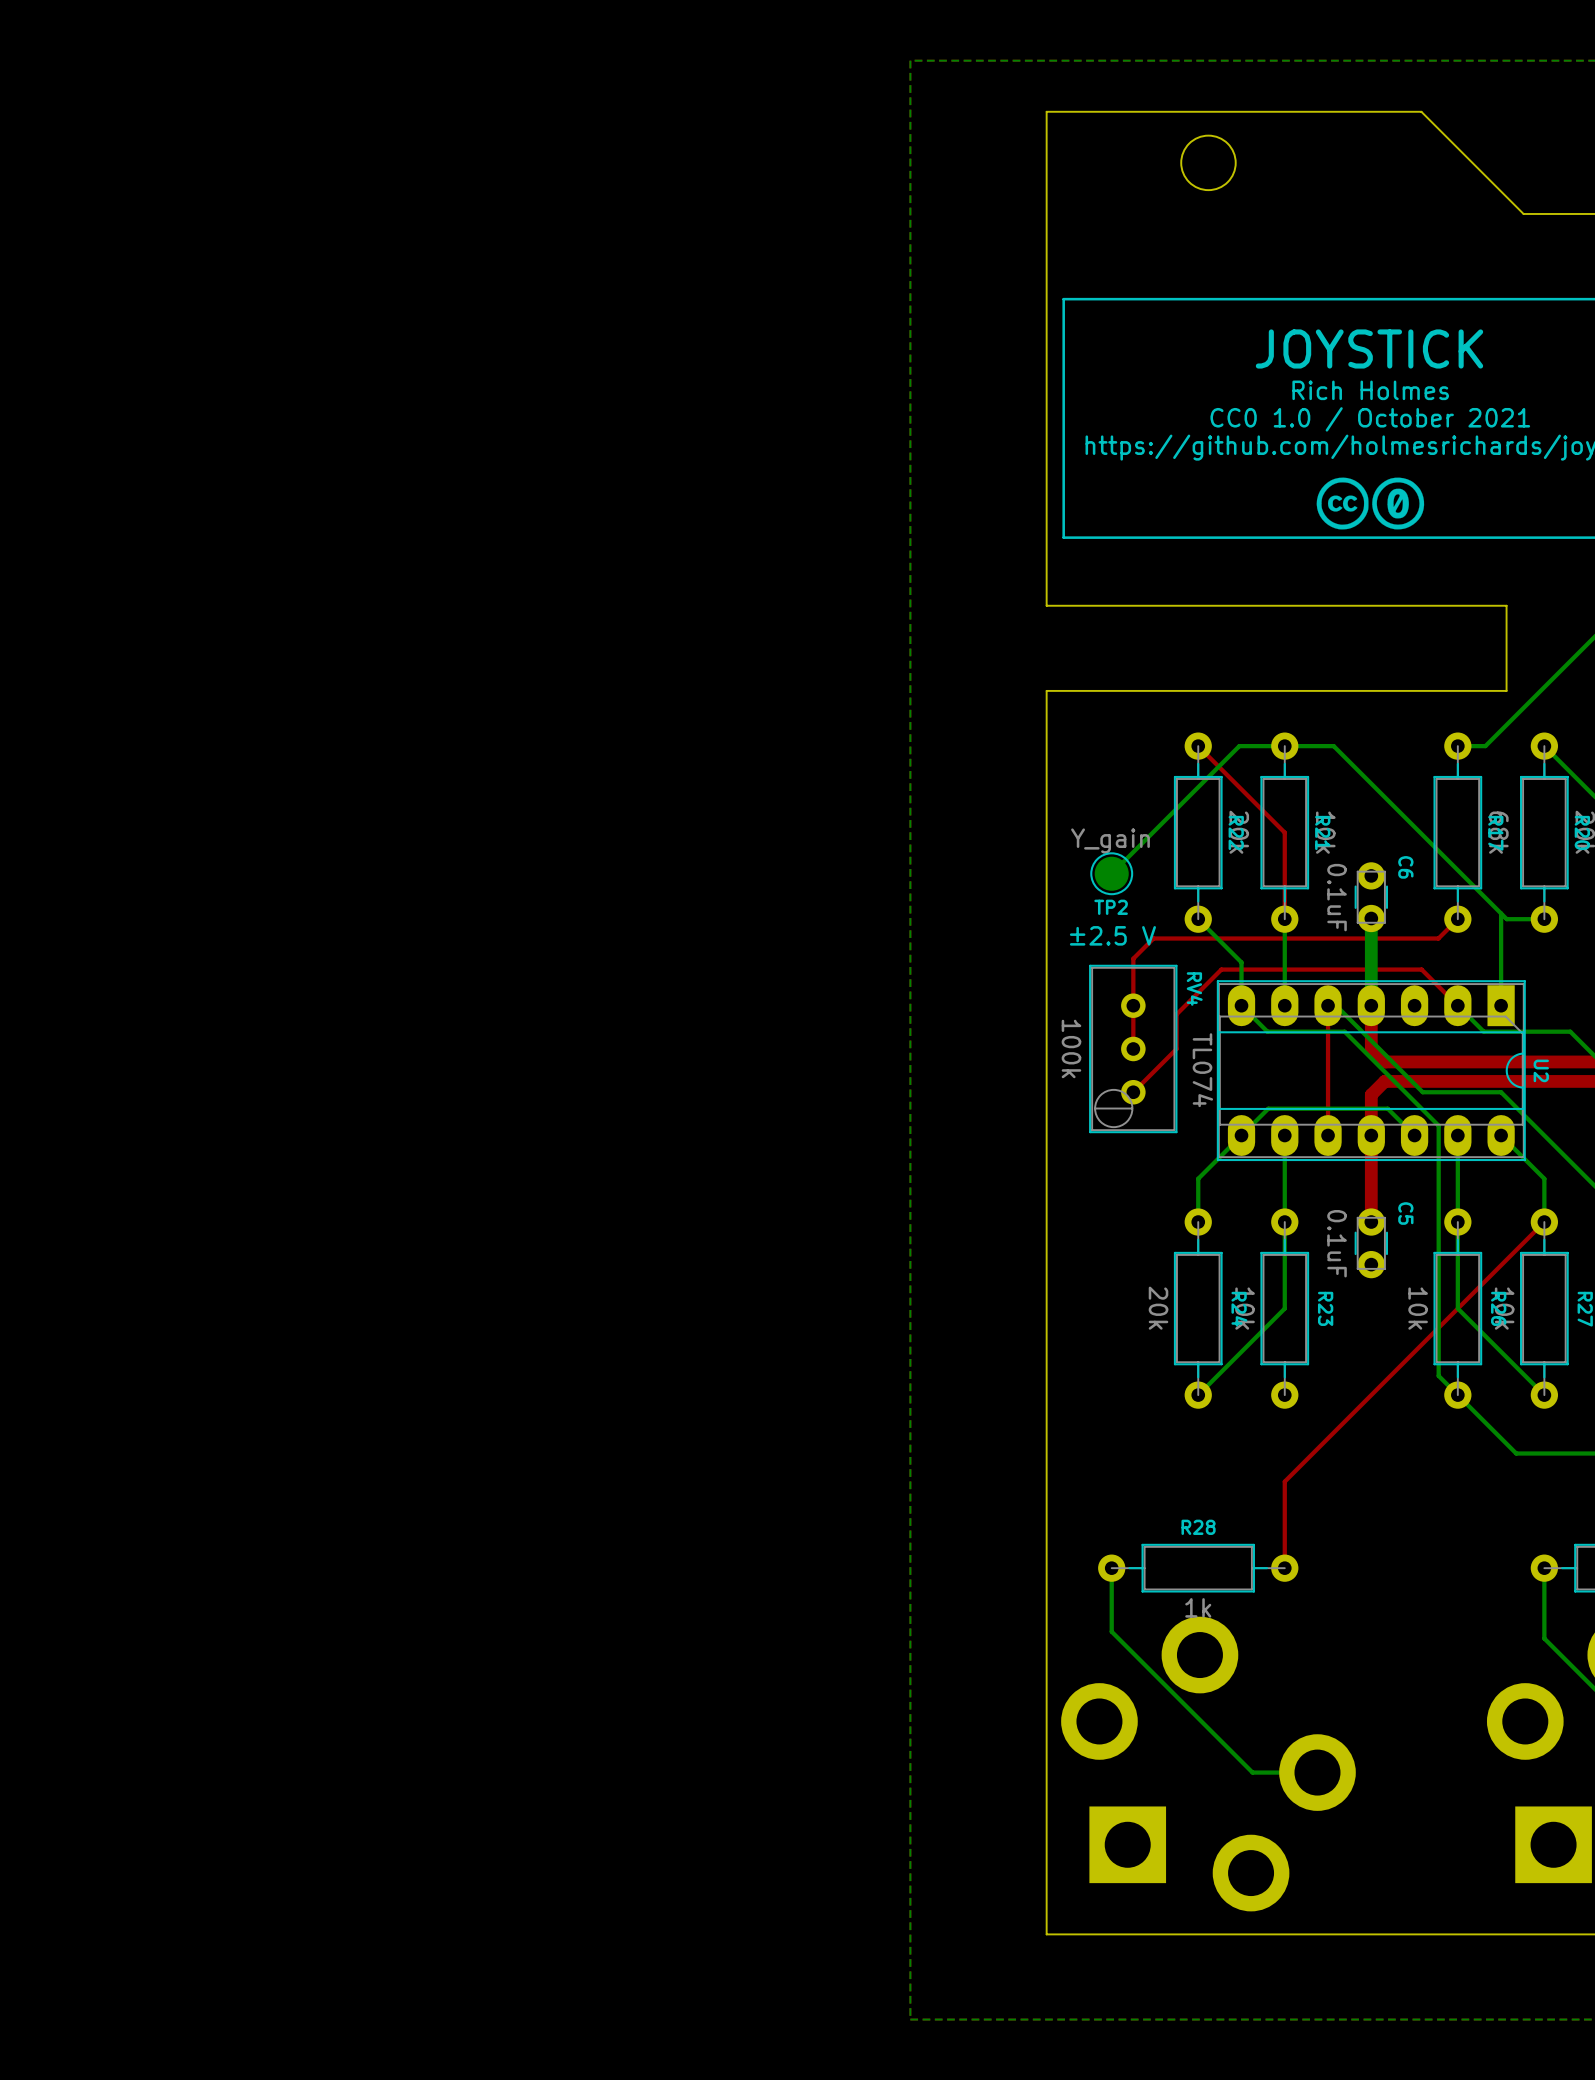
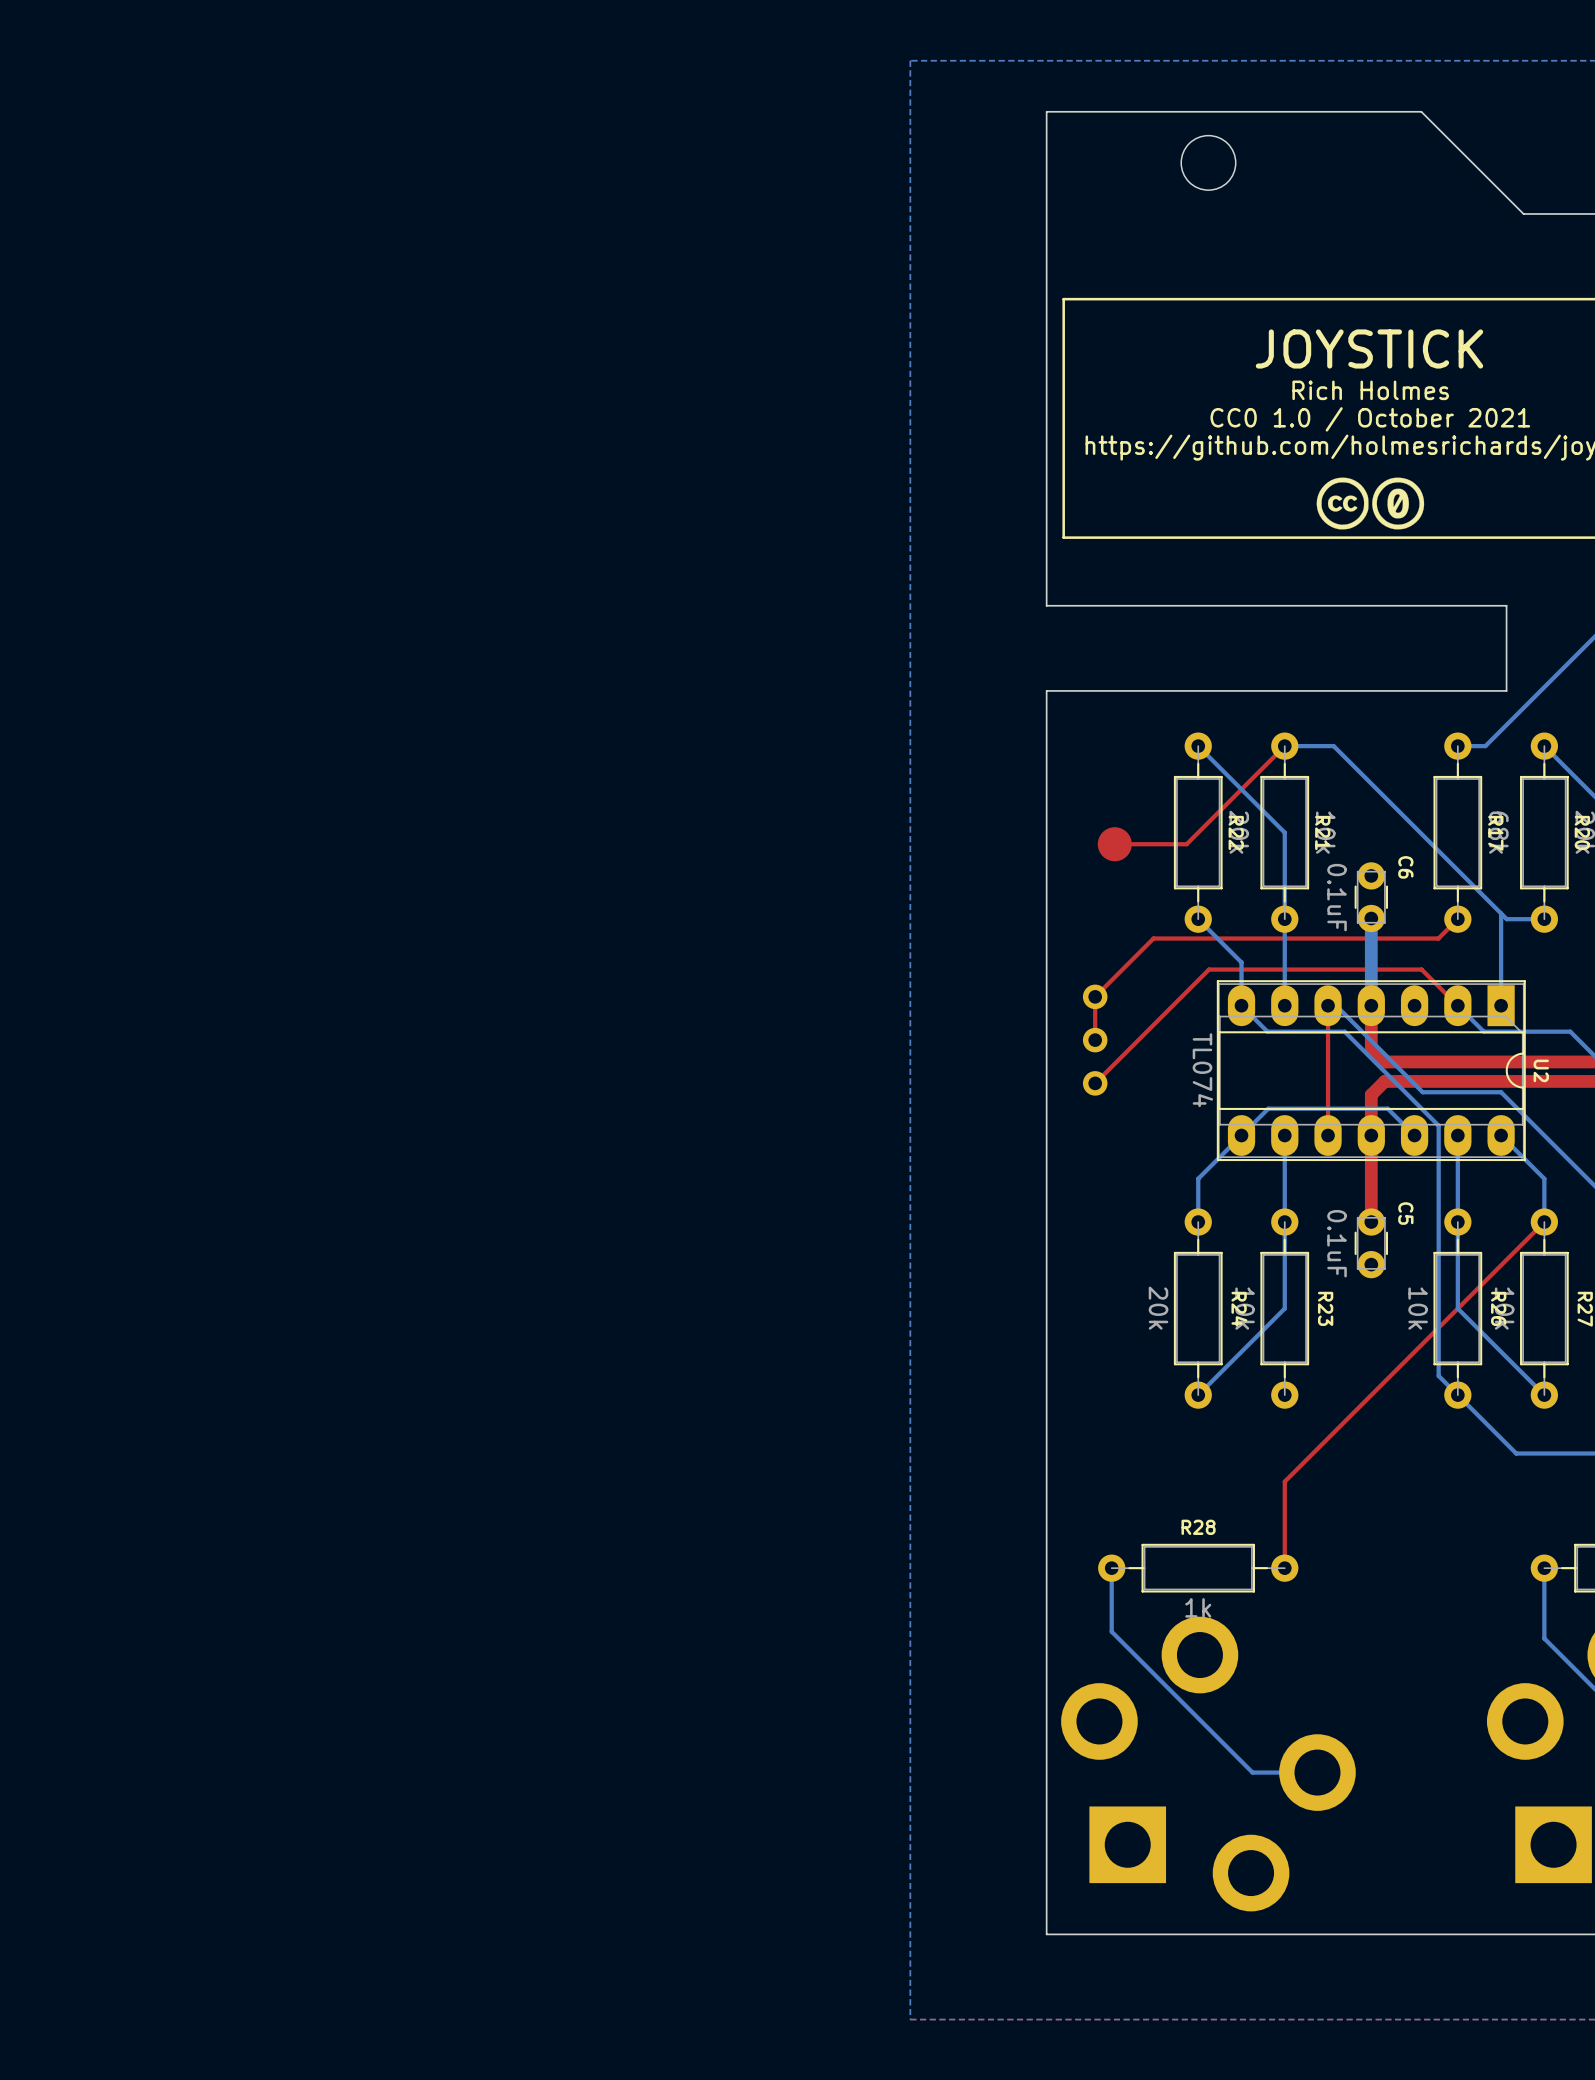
top track: (1198, 746) (1284, 832) (1284, 919) -> none
bottom track: none -> (1198, 746) (1284, 832) (1284, 919)
top track: none -> (1284, 746) (1186, 844) (1114, 844)
bottom track: (1284, 746) (1239, 746) (1111, 873) -> none
TP2 side: bottom (1111, 873) -> top (1114, 844)
text: ±2.5 V (1112, 935) -> none
top track: (1133, 958) (1133, 1048) -> (1133, 958) (1095, 996) (1095, 1040)
top track: (1221, 969) (1176, 1014) (1176, 1048) (1133, 1092) -> (1221, 969) (1209, 969) (1095, 1083)
RV4 side: bottom (1133, 1048) -> top (1095, 1040)

